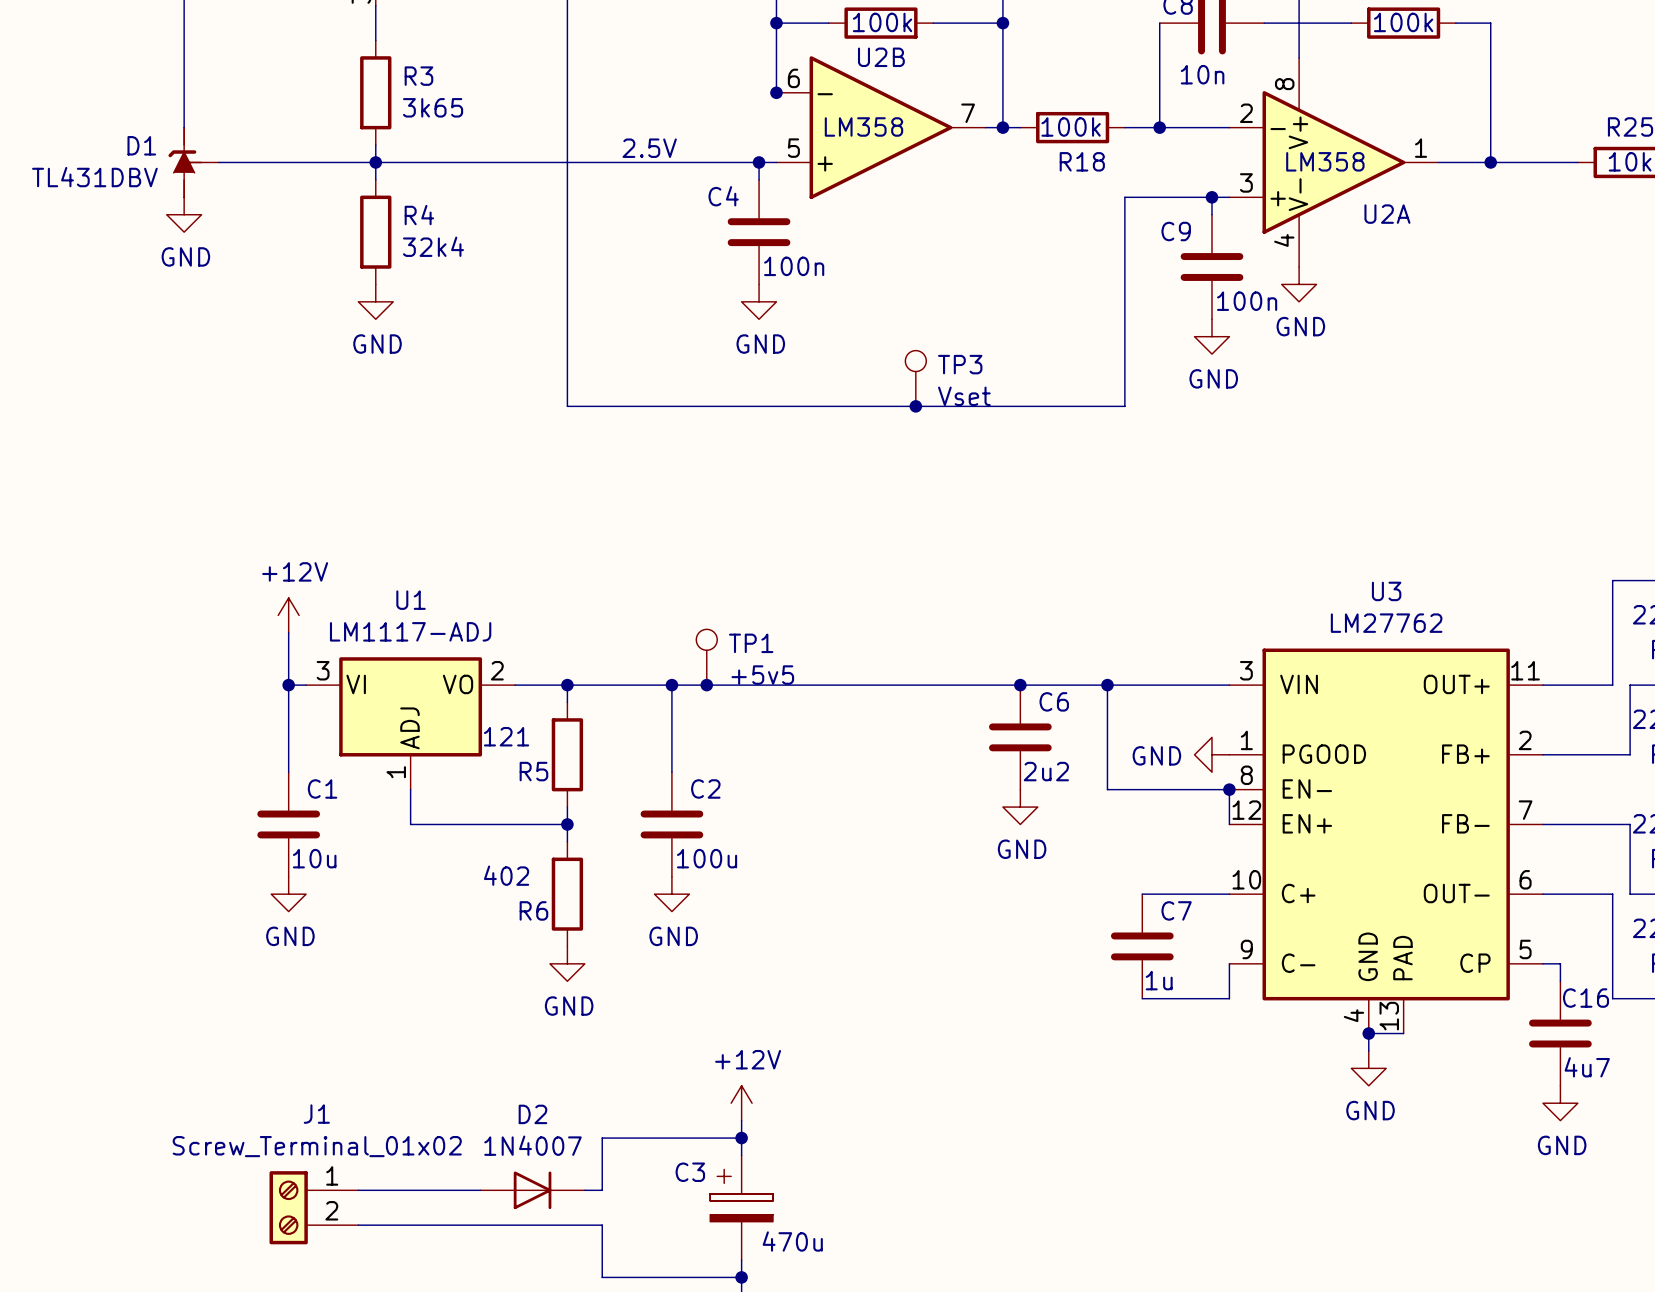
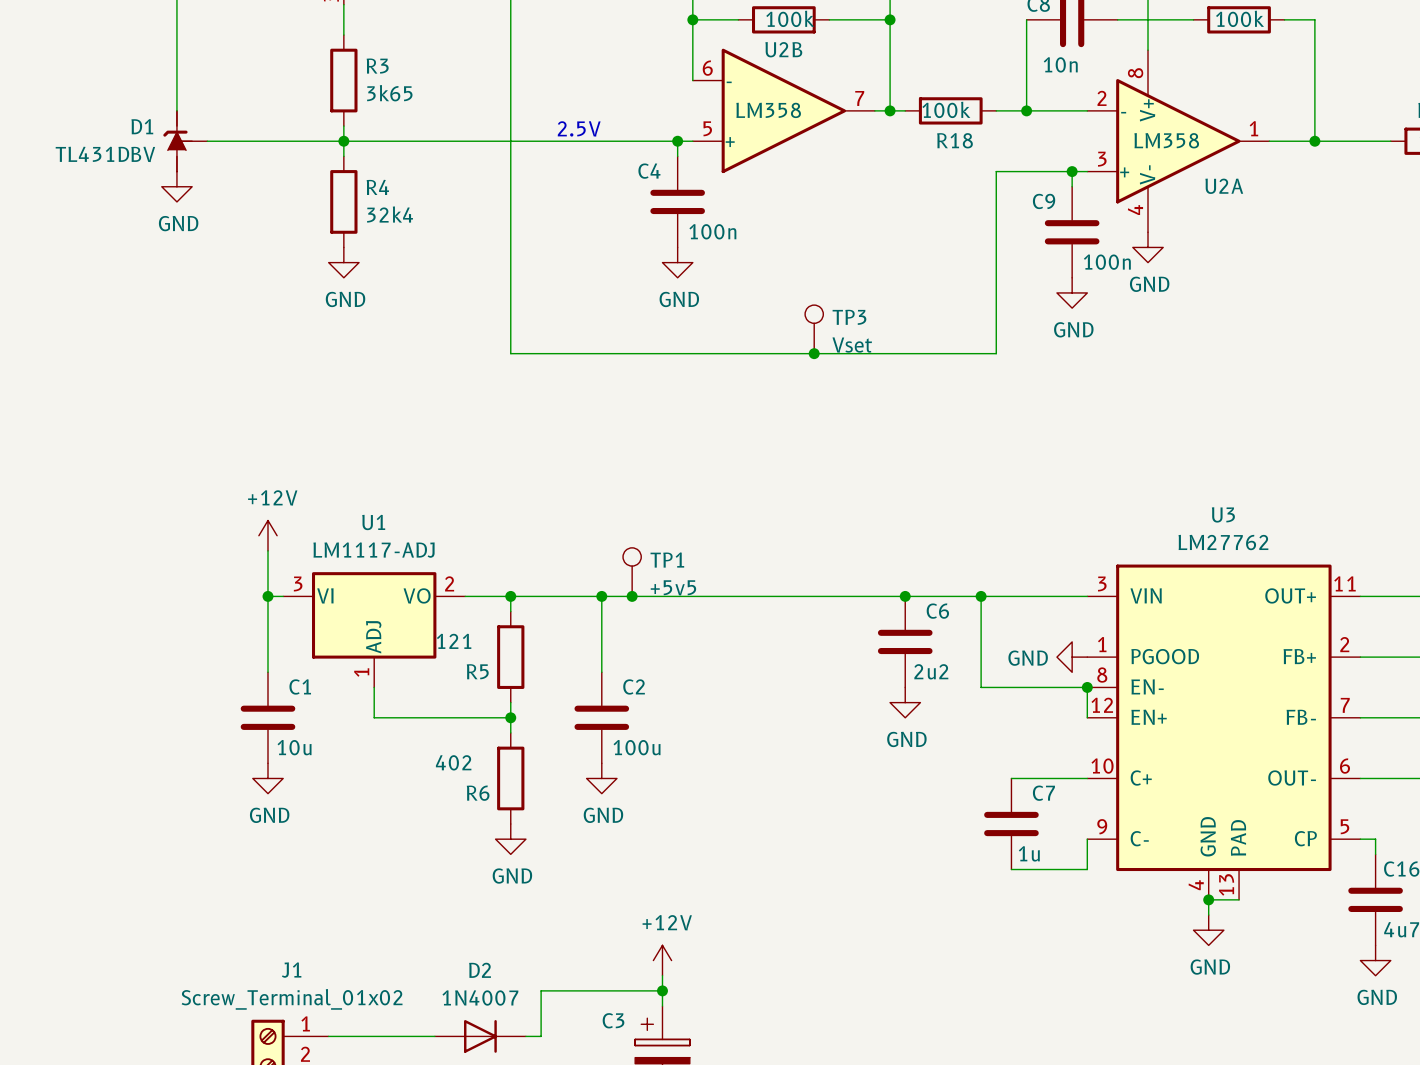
junction: (776, 92) -> none

